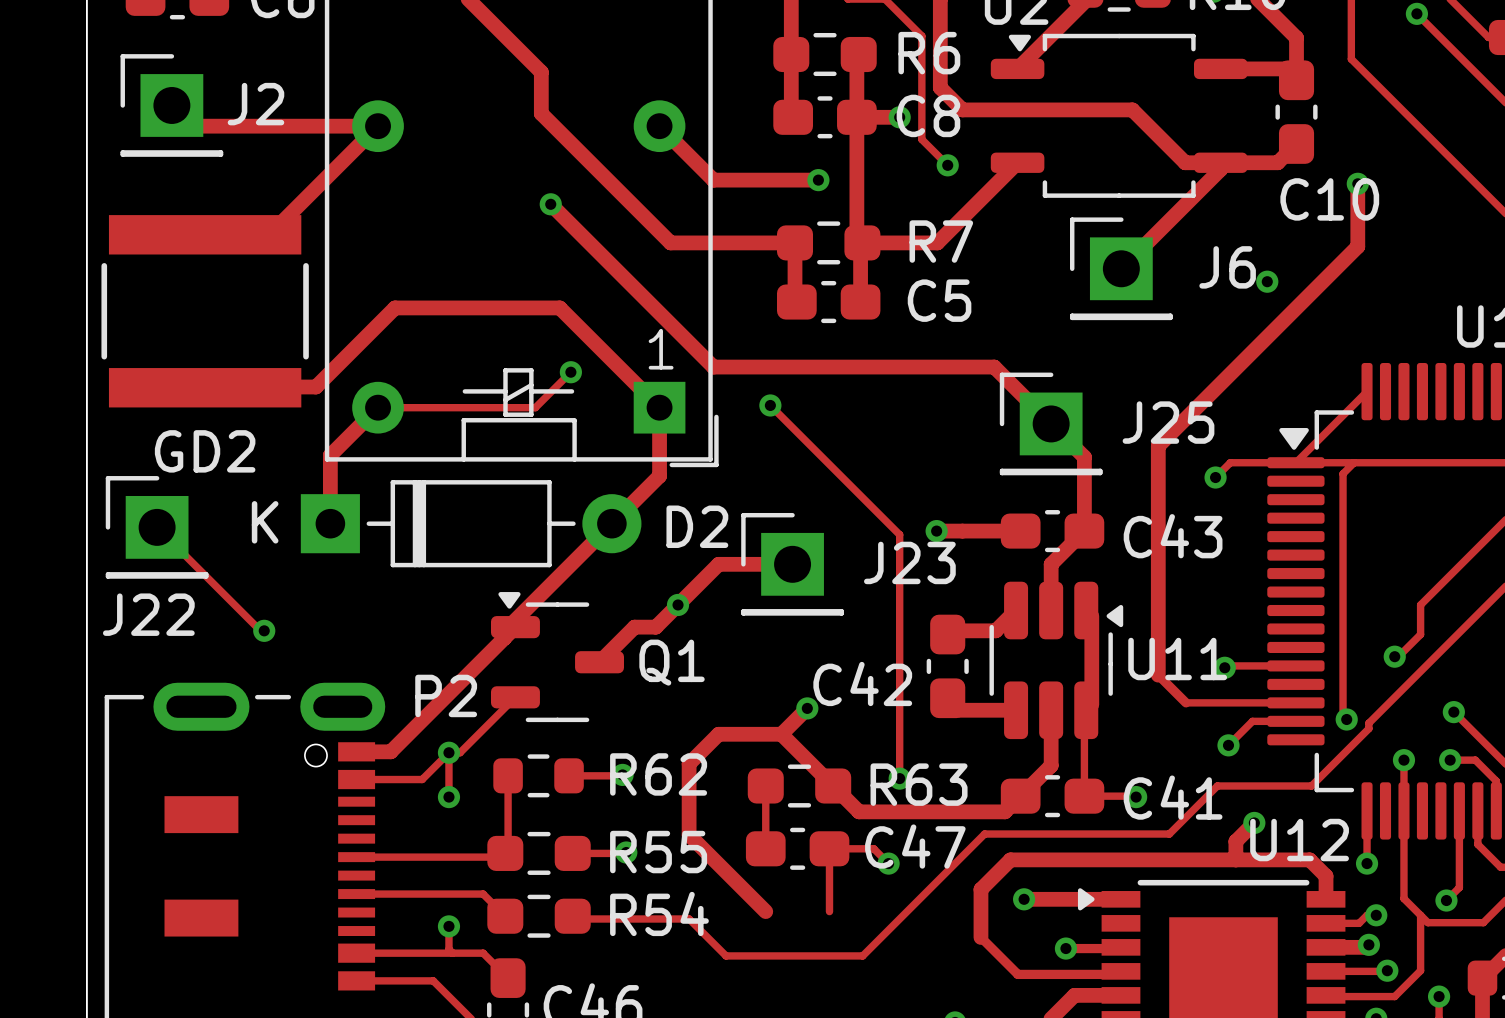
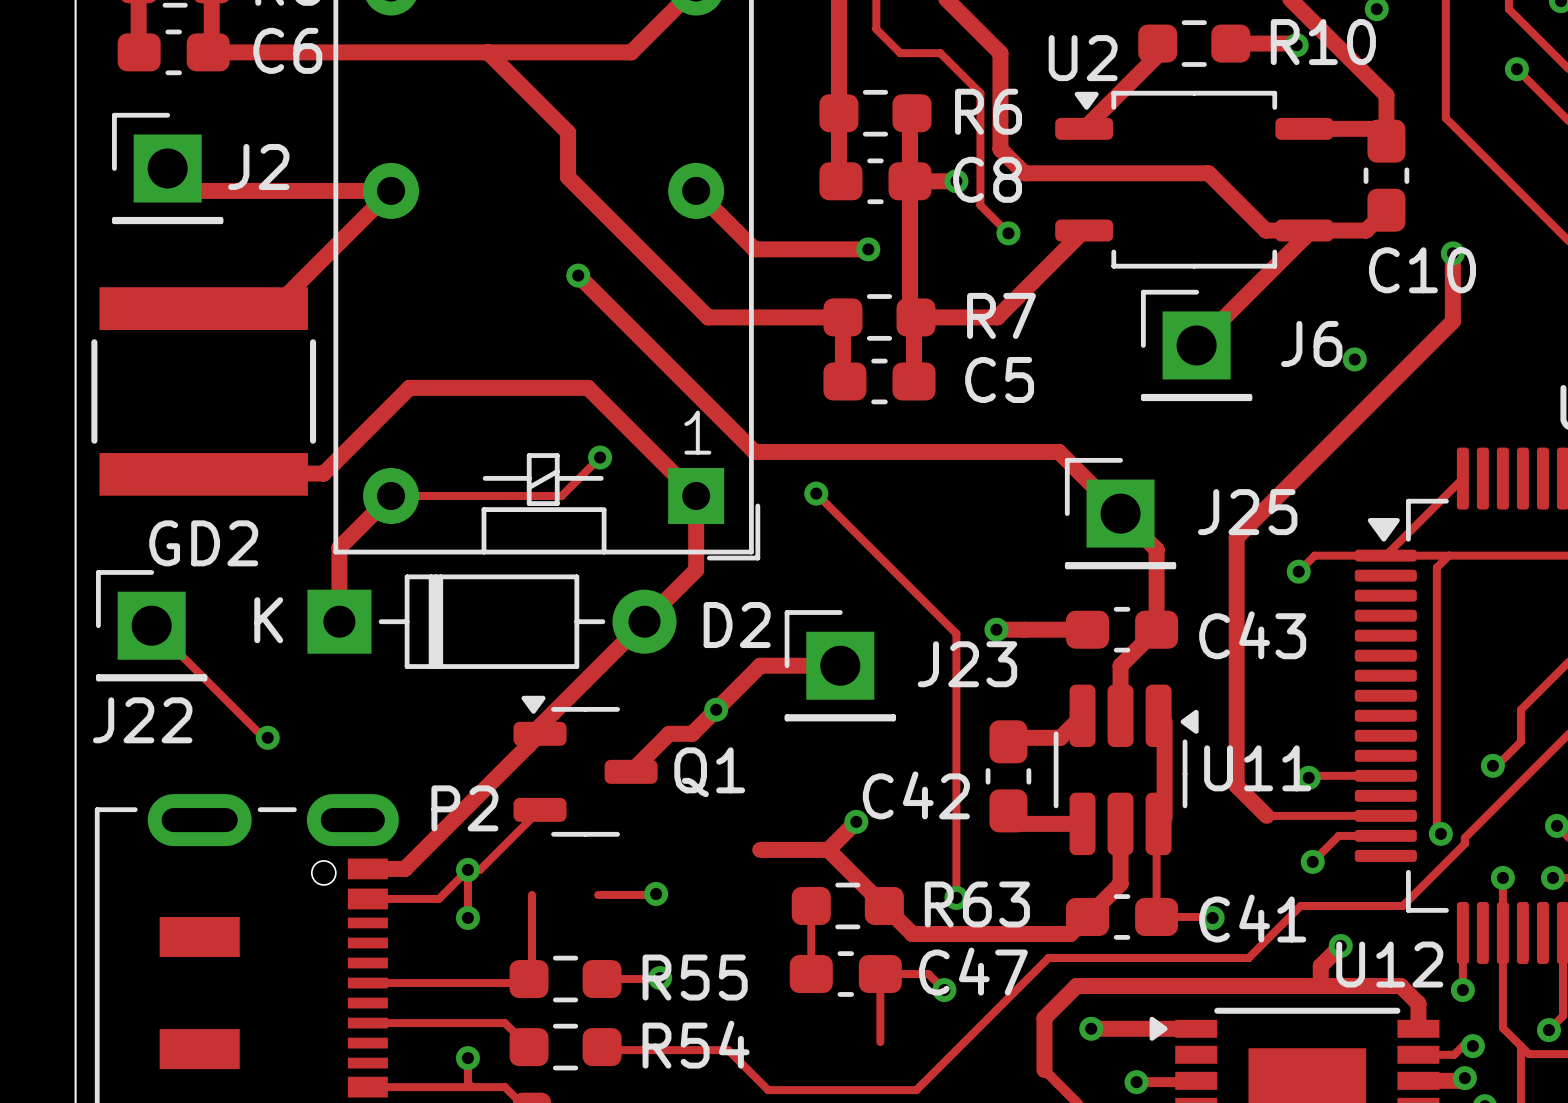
track width: thin (1158, 675) (1186, 702) -> thick (1236, 785) (1266, 815)
track: (718, 734) (689, 763) (689, 834) (765, 911) -> none
R62: (538, 775) -> none

